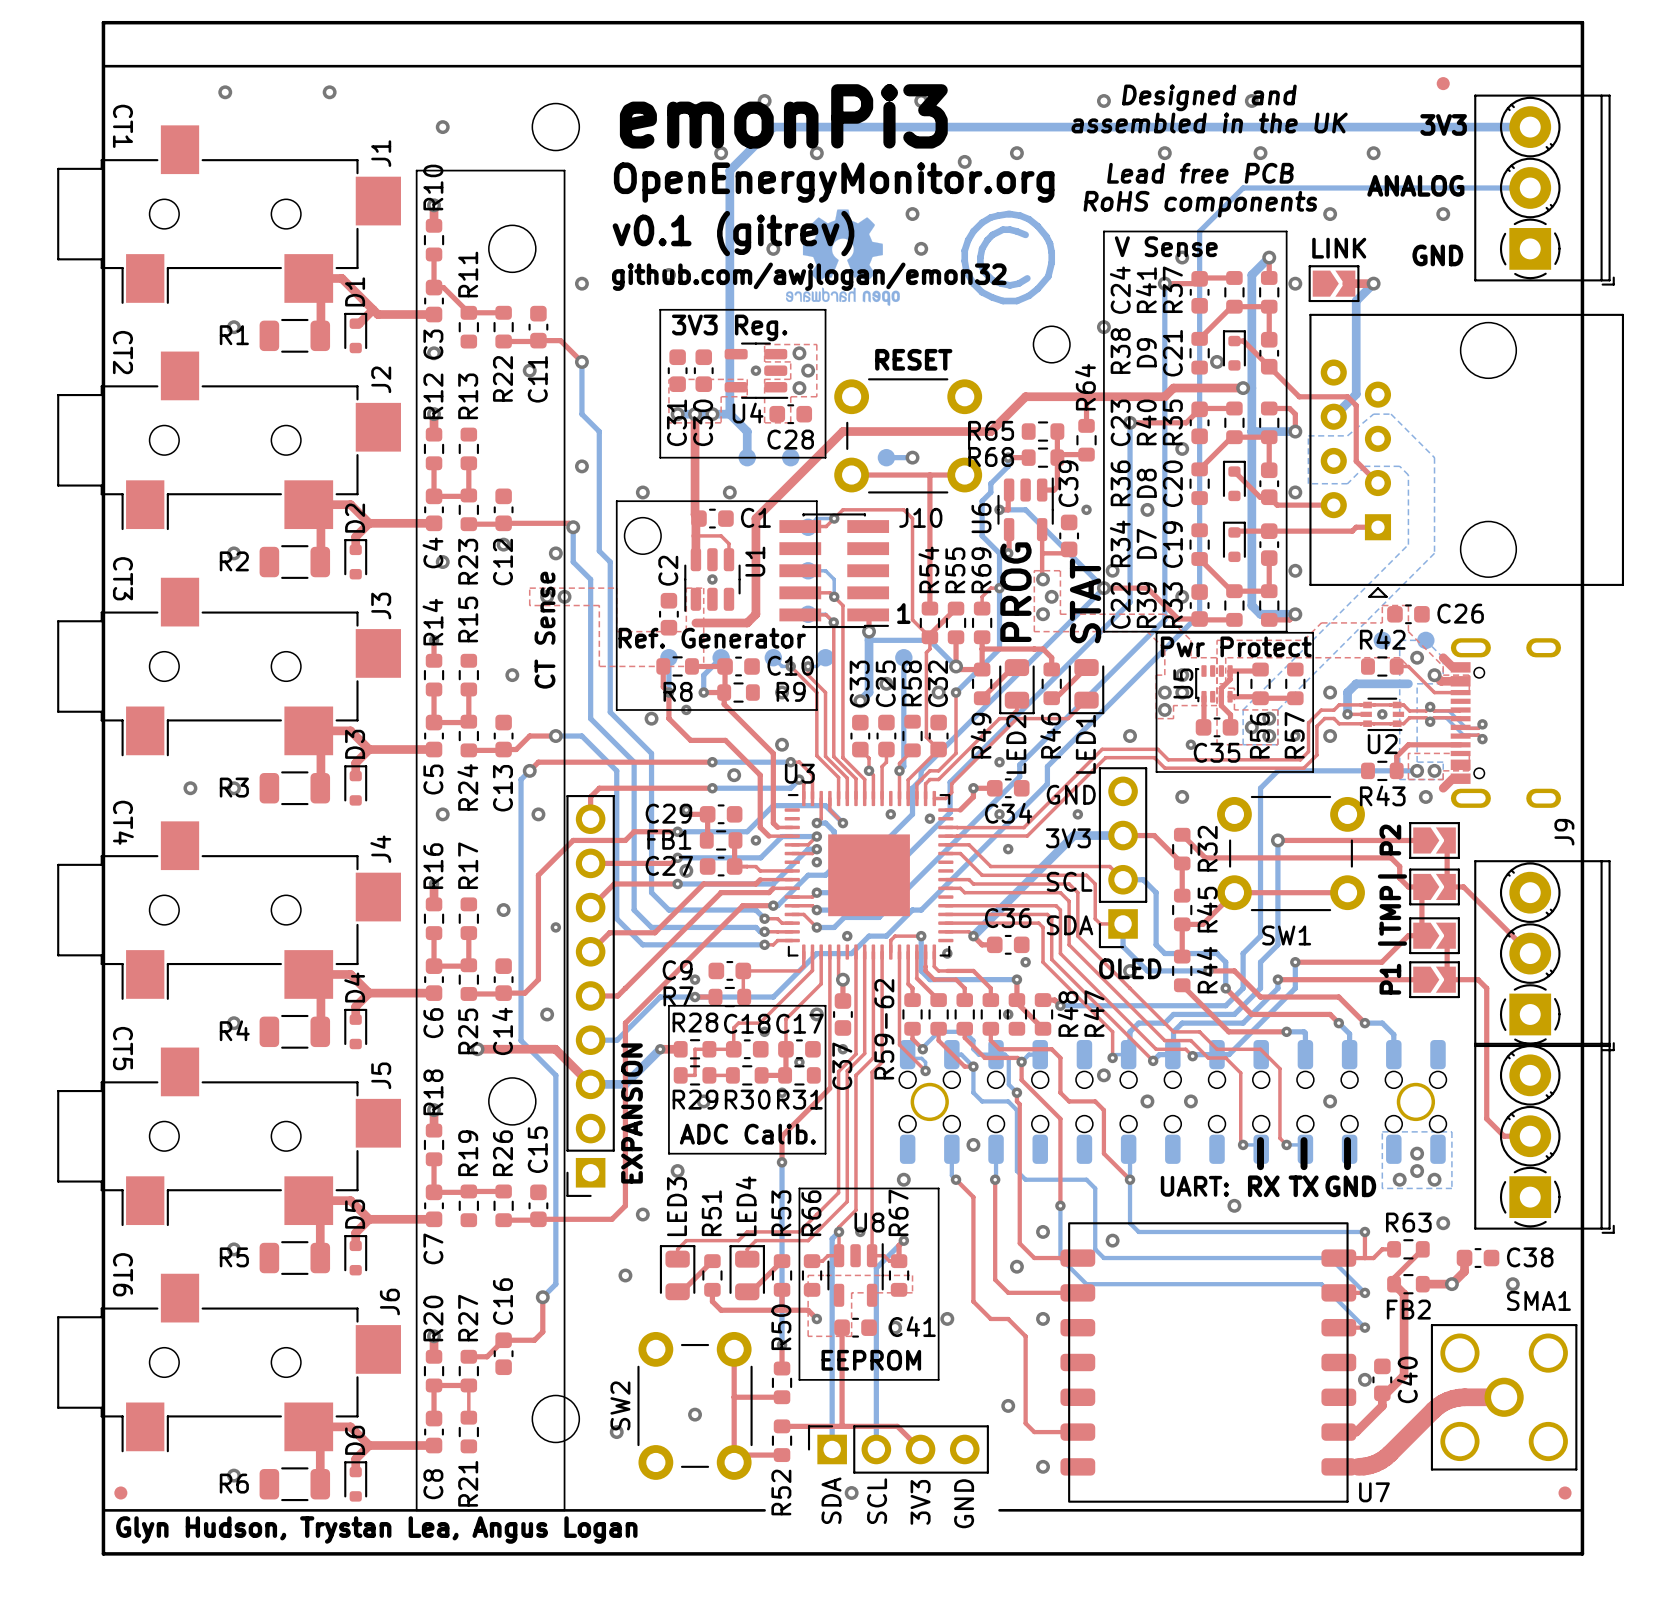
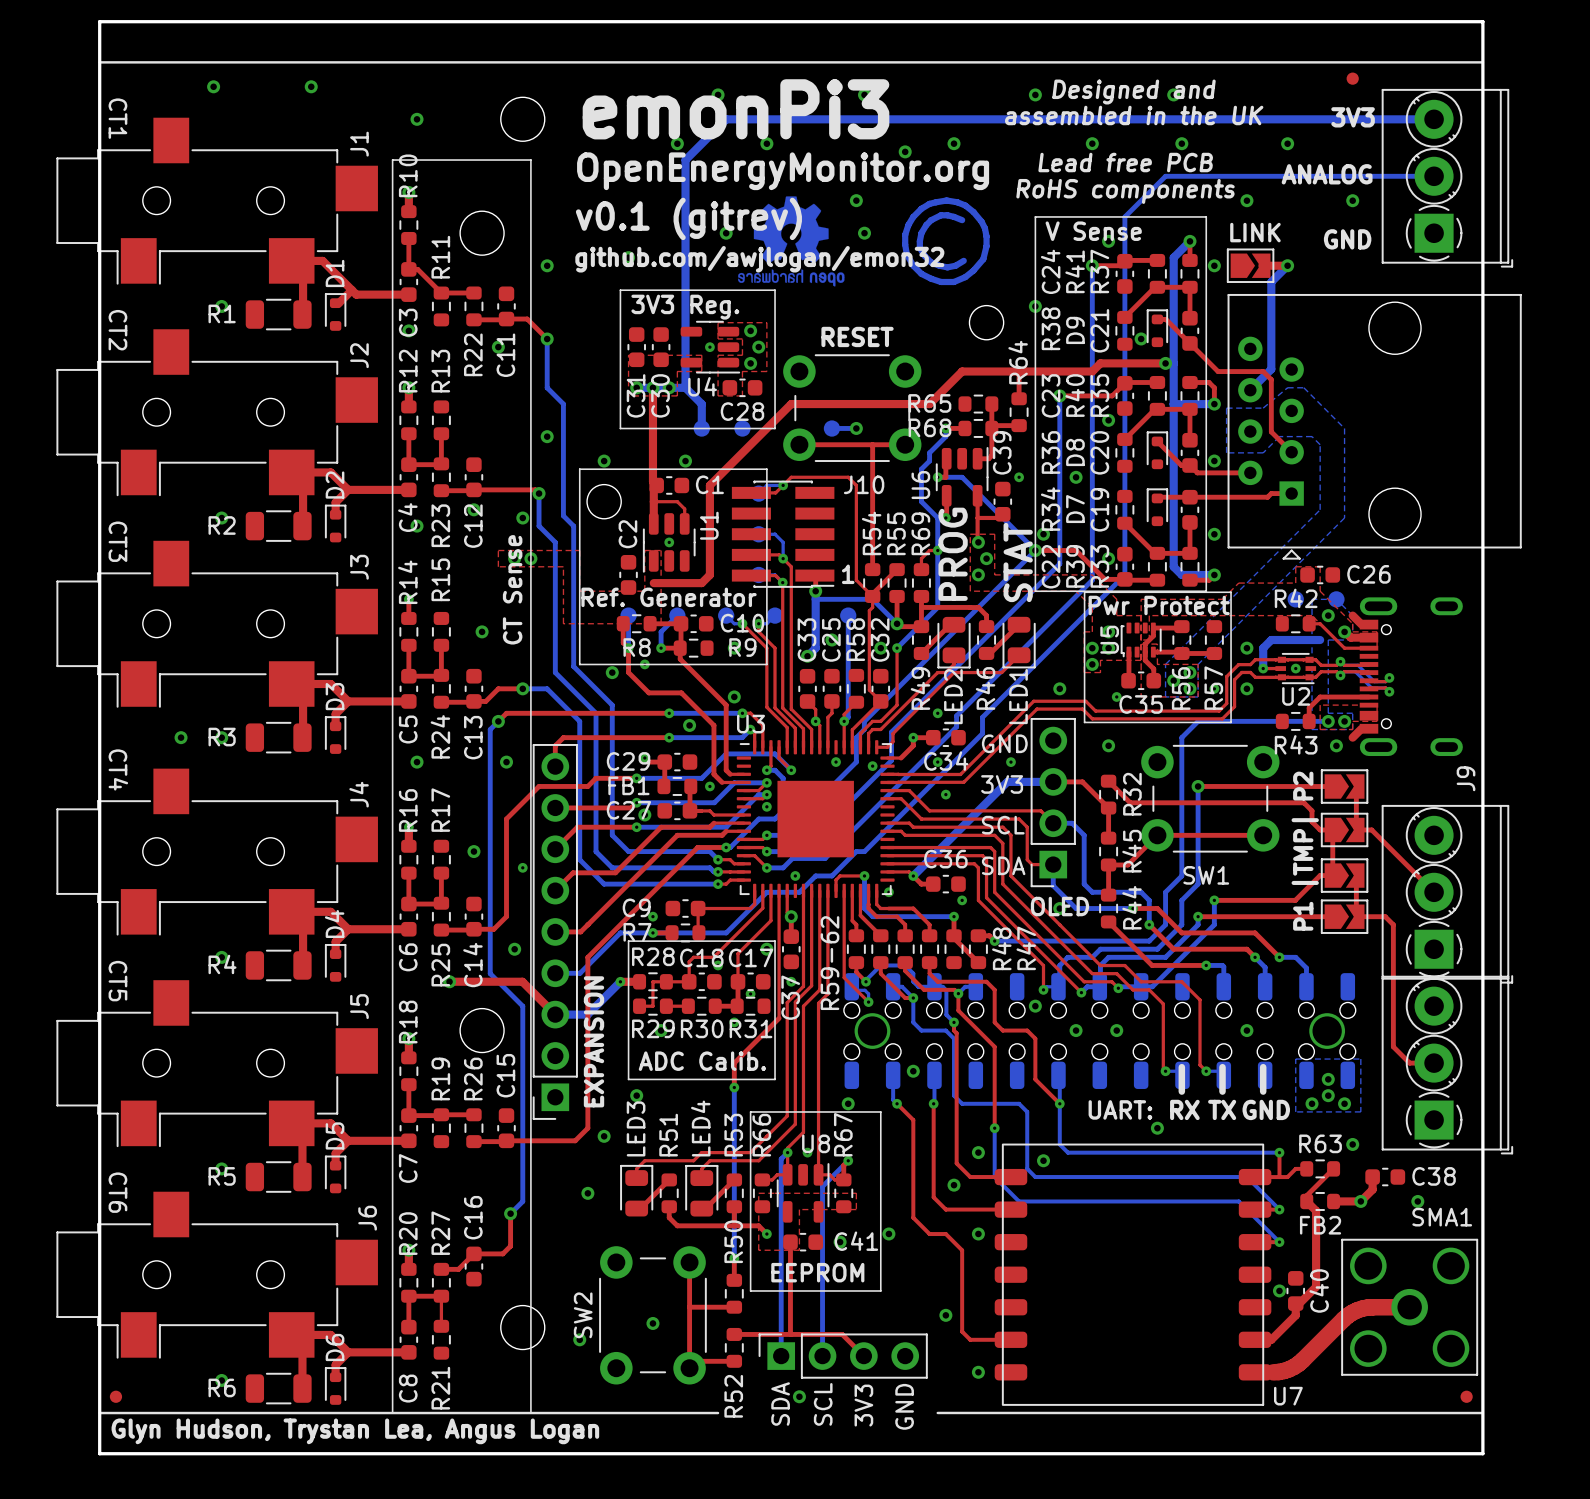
via: (1008, 1014) -> none

